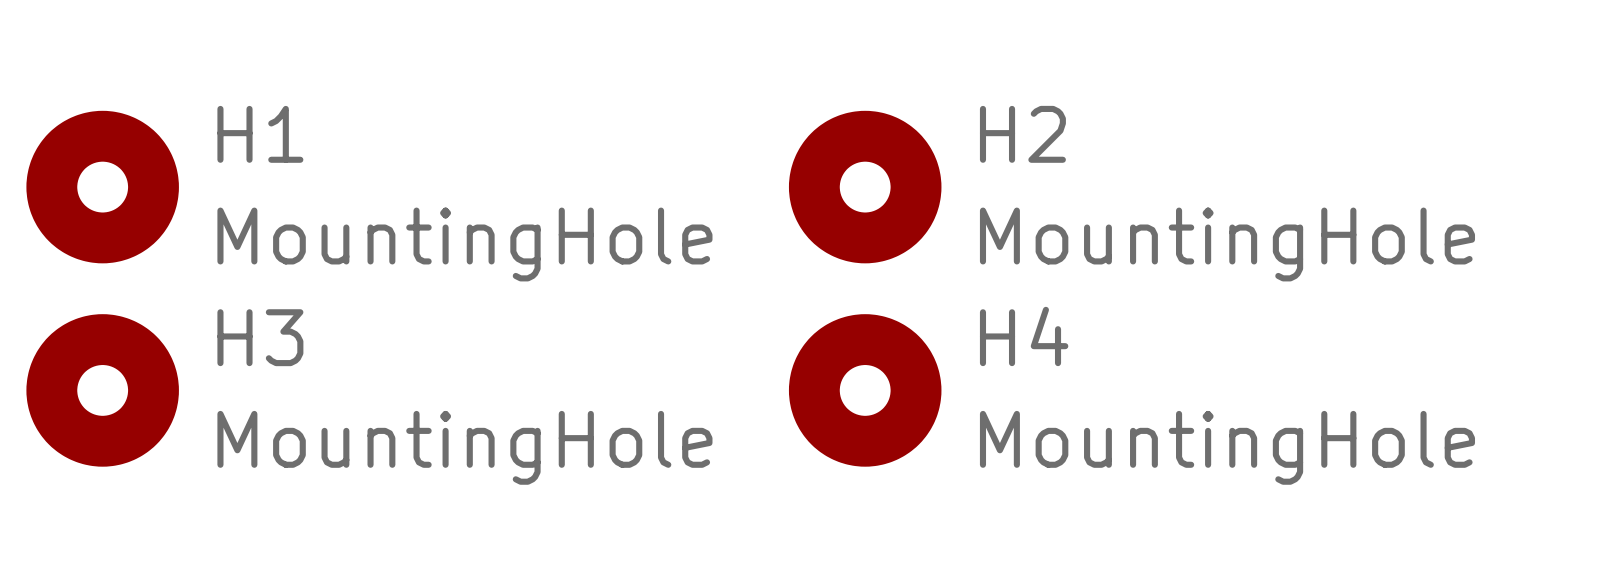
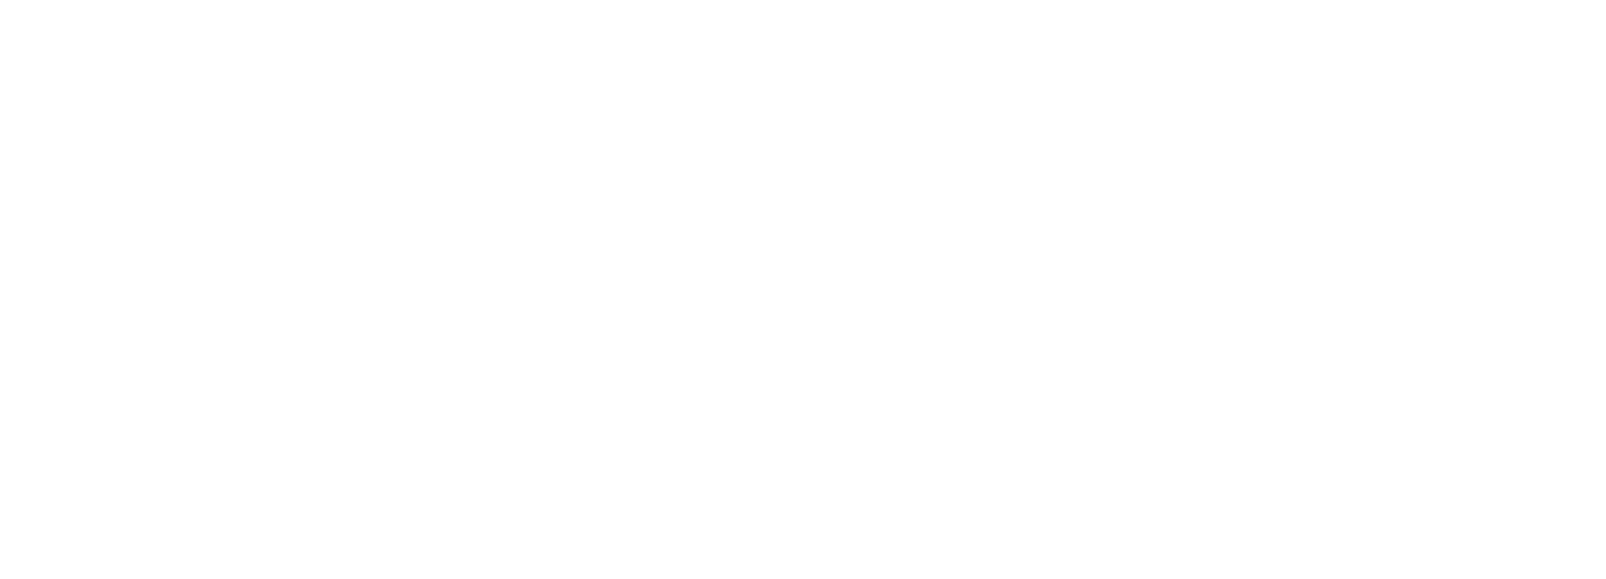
H1: MountingHole (102, 187) -> none
H2: MountingHole (865, 187) -> none
H3: MountingHole (102, 390) -> none
H4: MountingHole (865, 390) -> none

